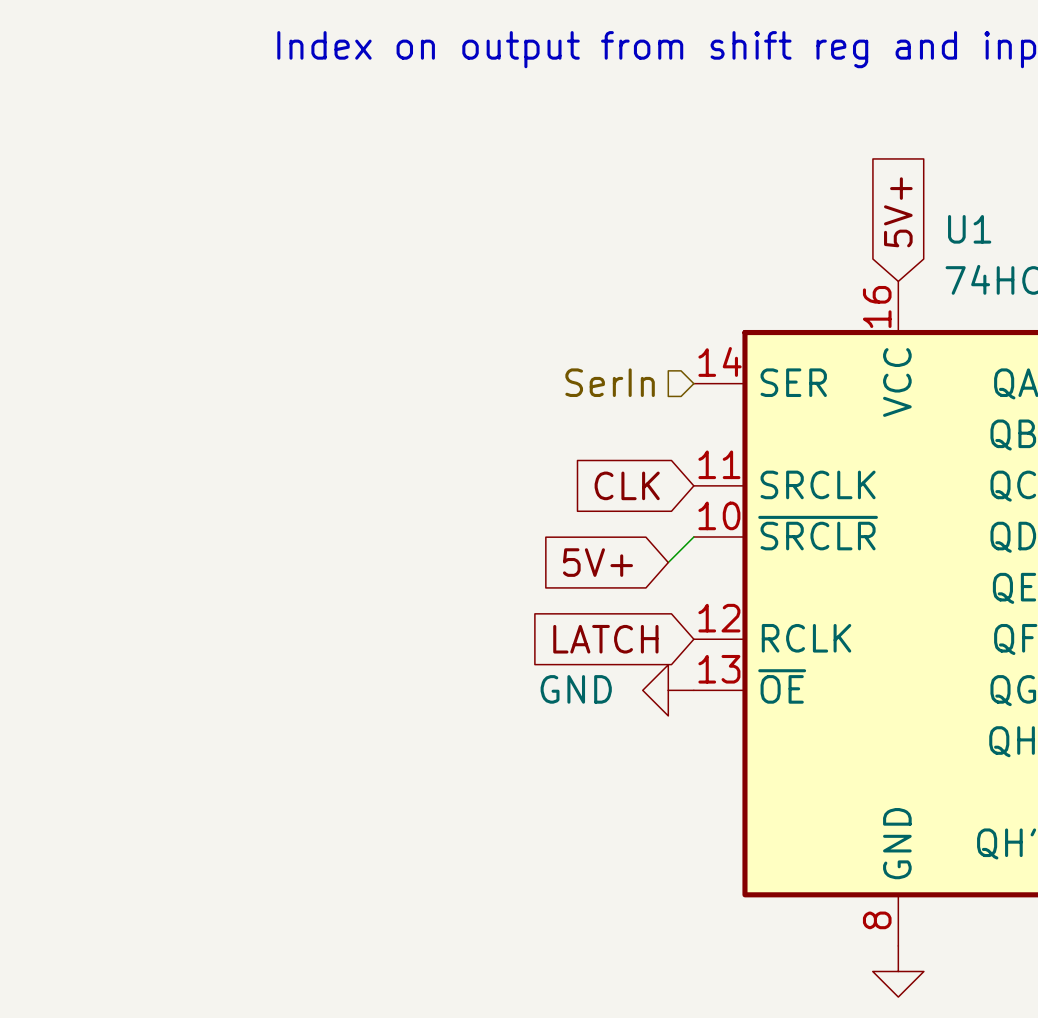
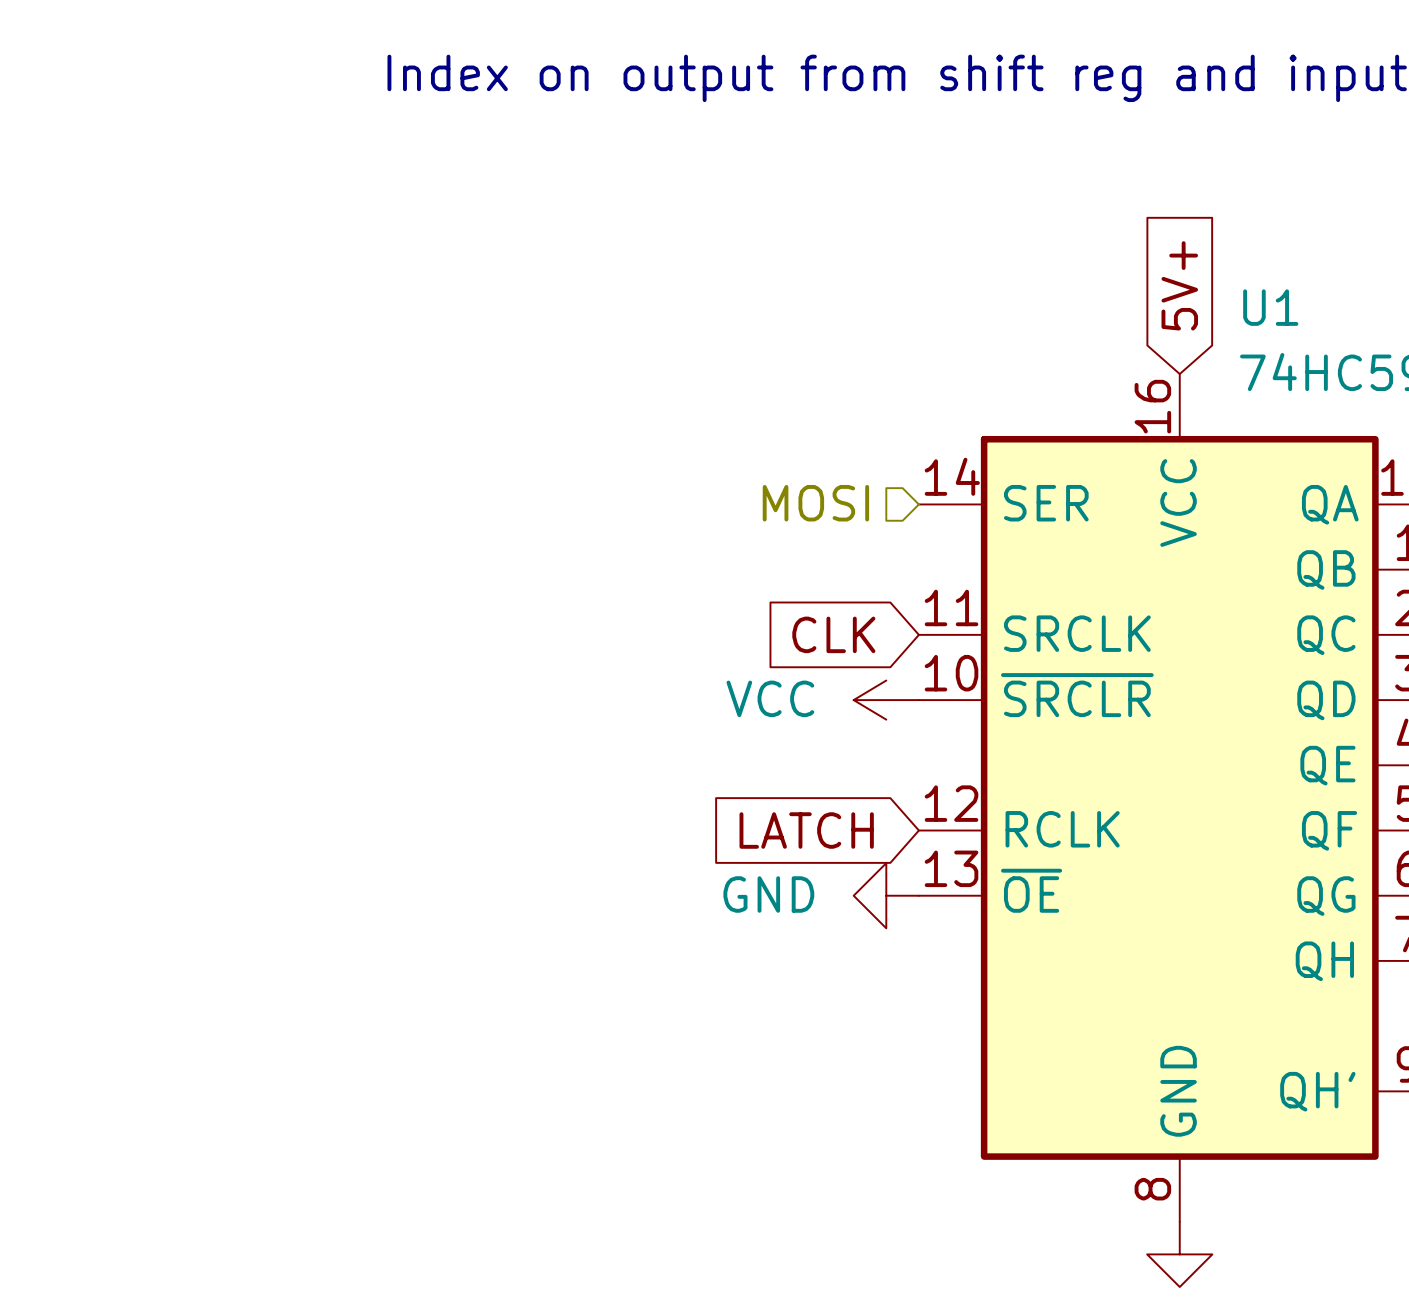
hierarchical label: SerIn (610, 382) -> MOSI (815, 503)
power symbol: none -> VCC (886, 700)
wire: (693, 537) (668, 562) -> none
global label: 5V+ (597, 562) -> none

